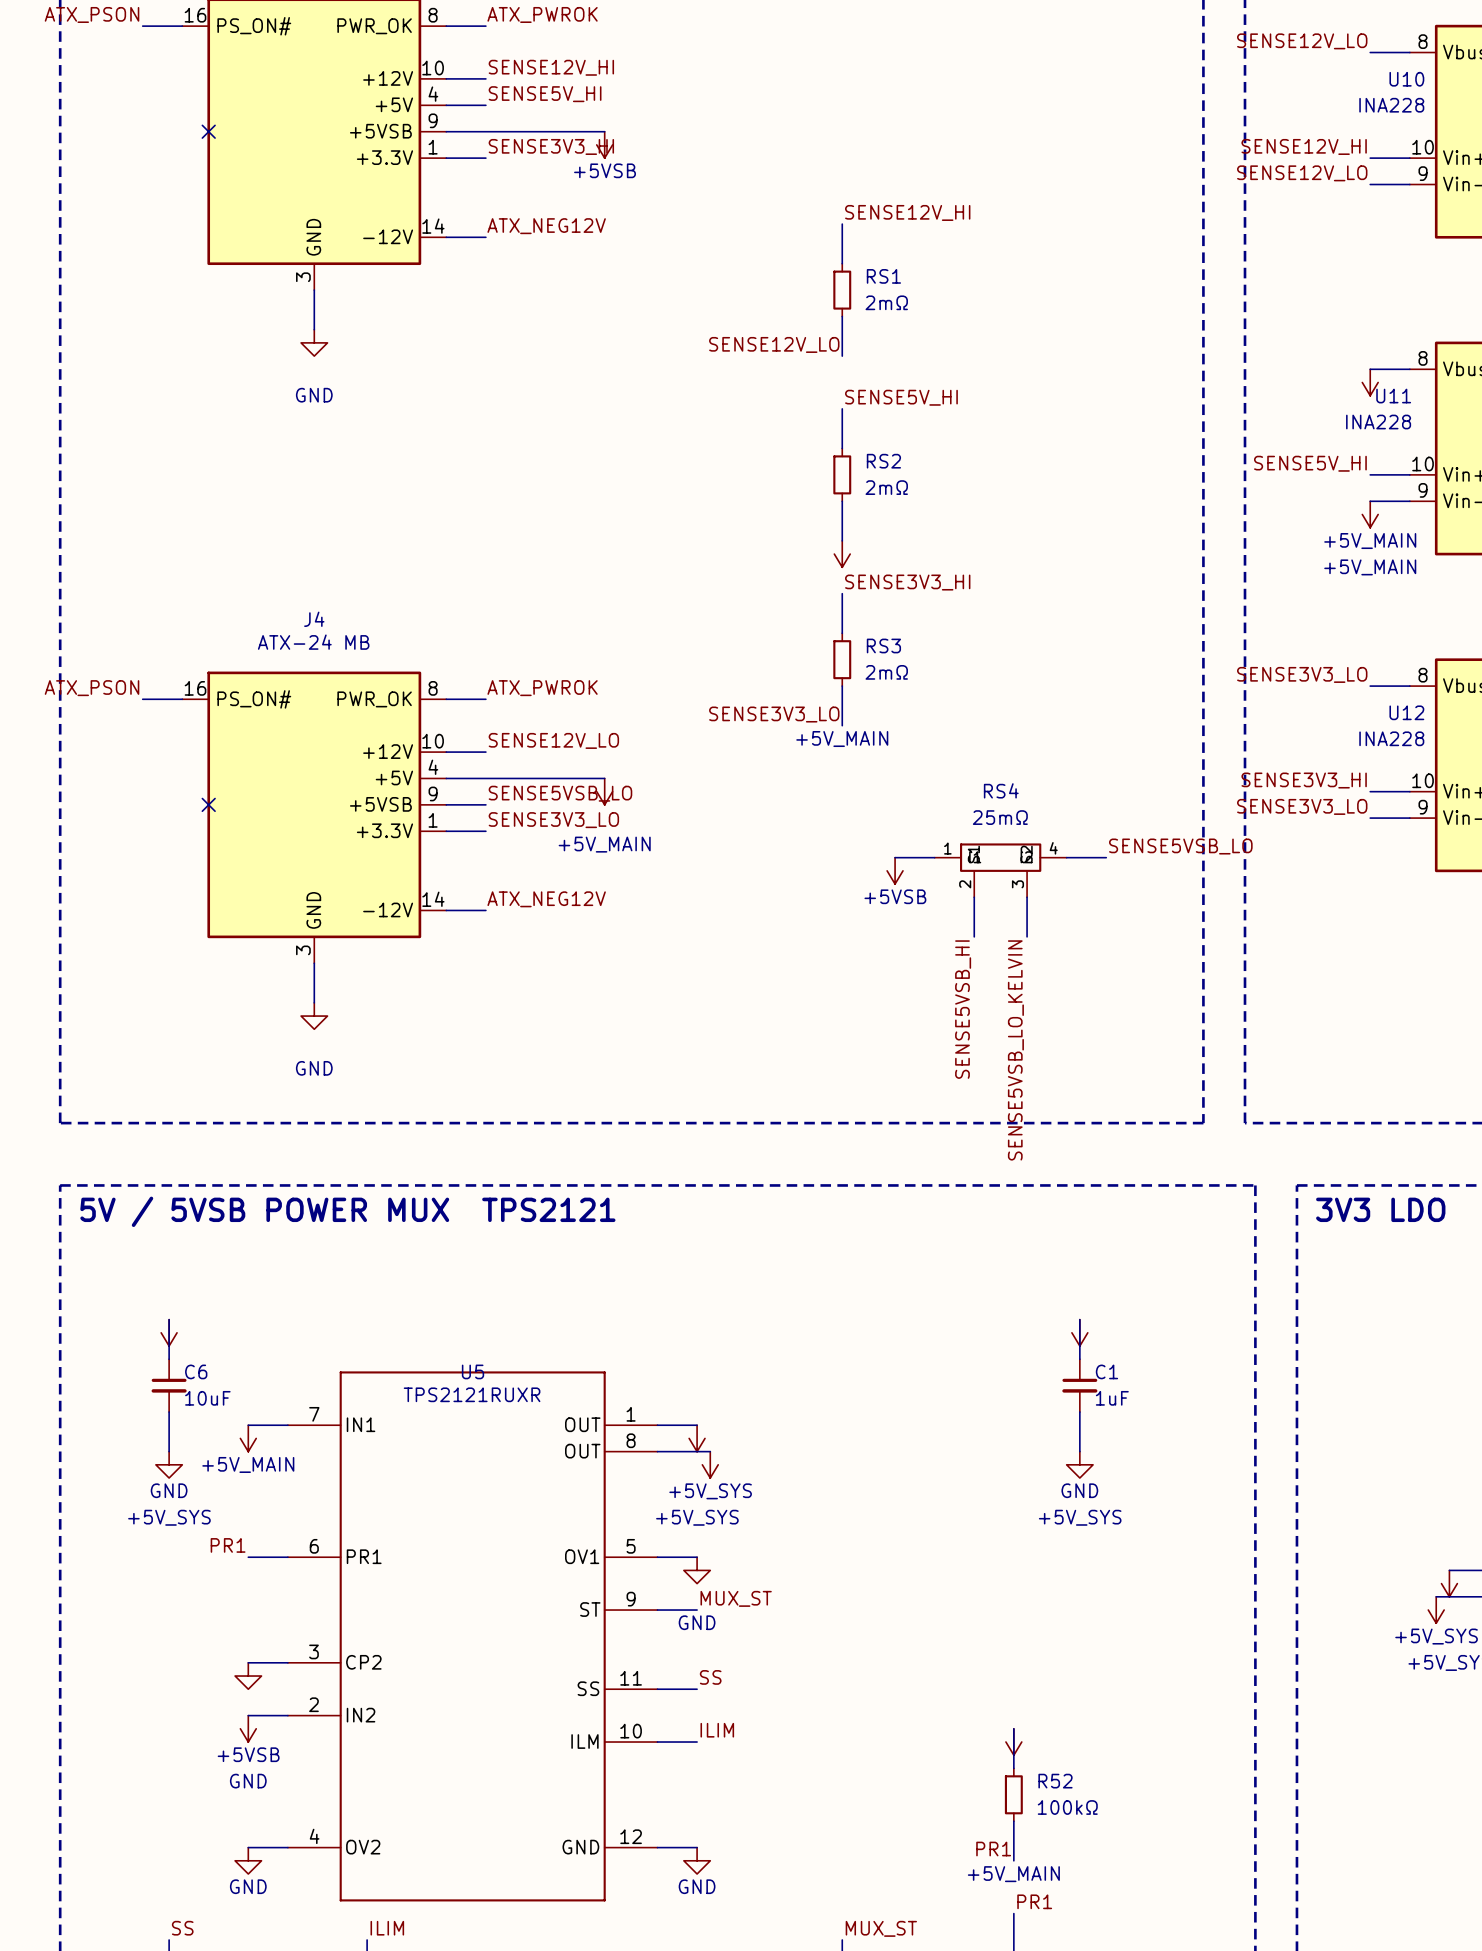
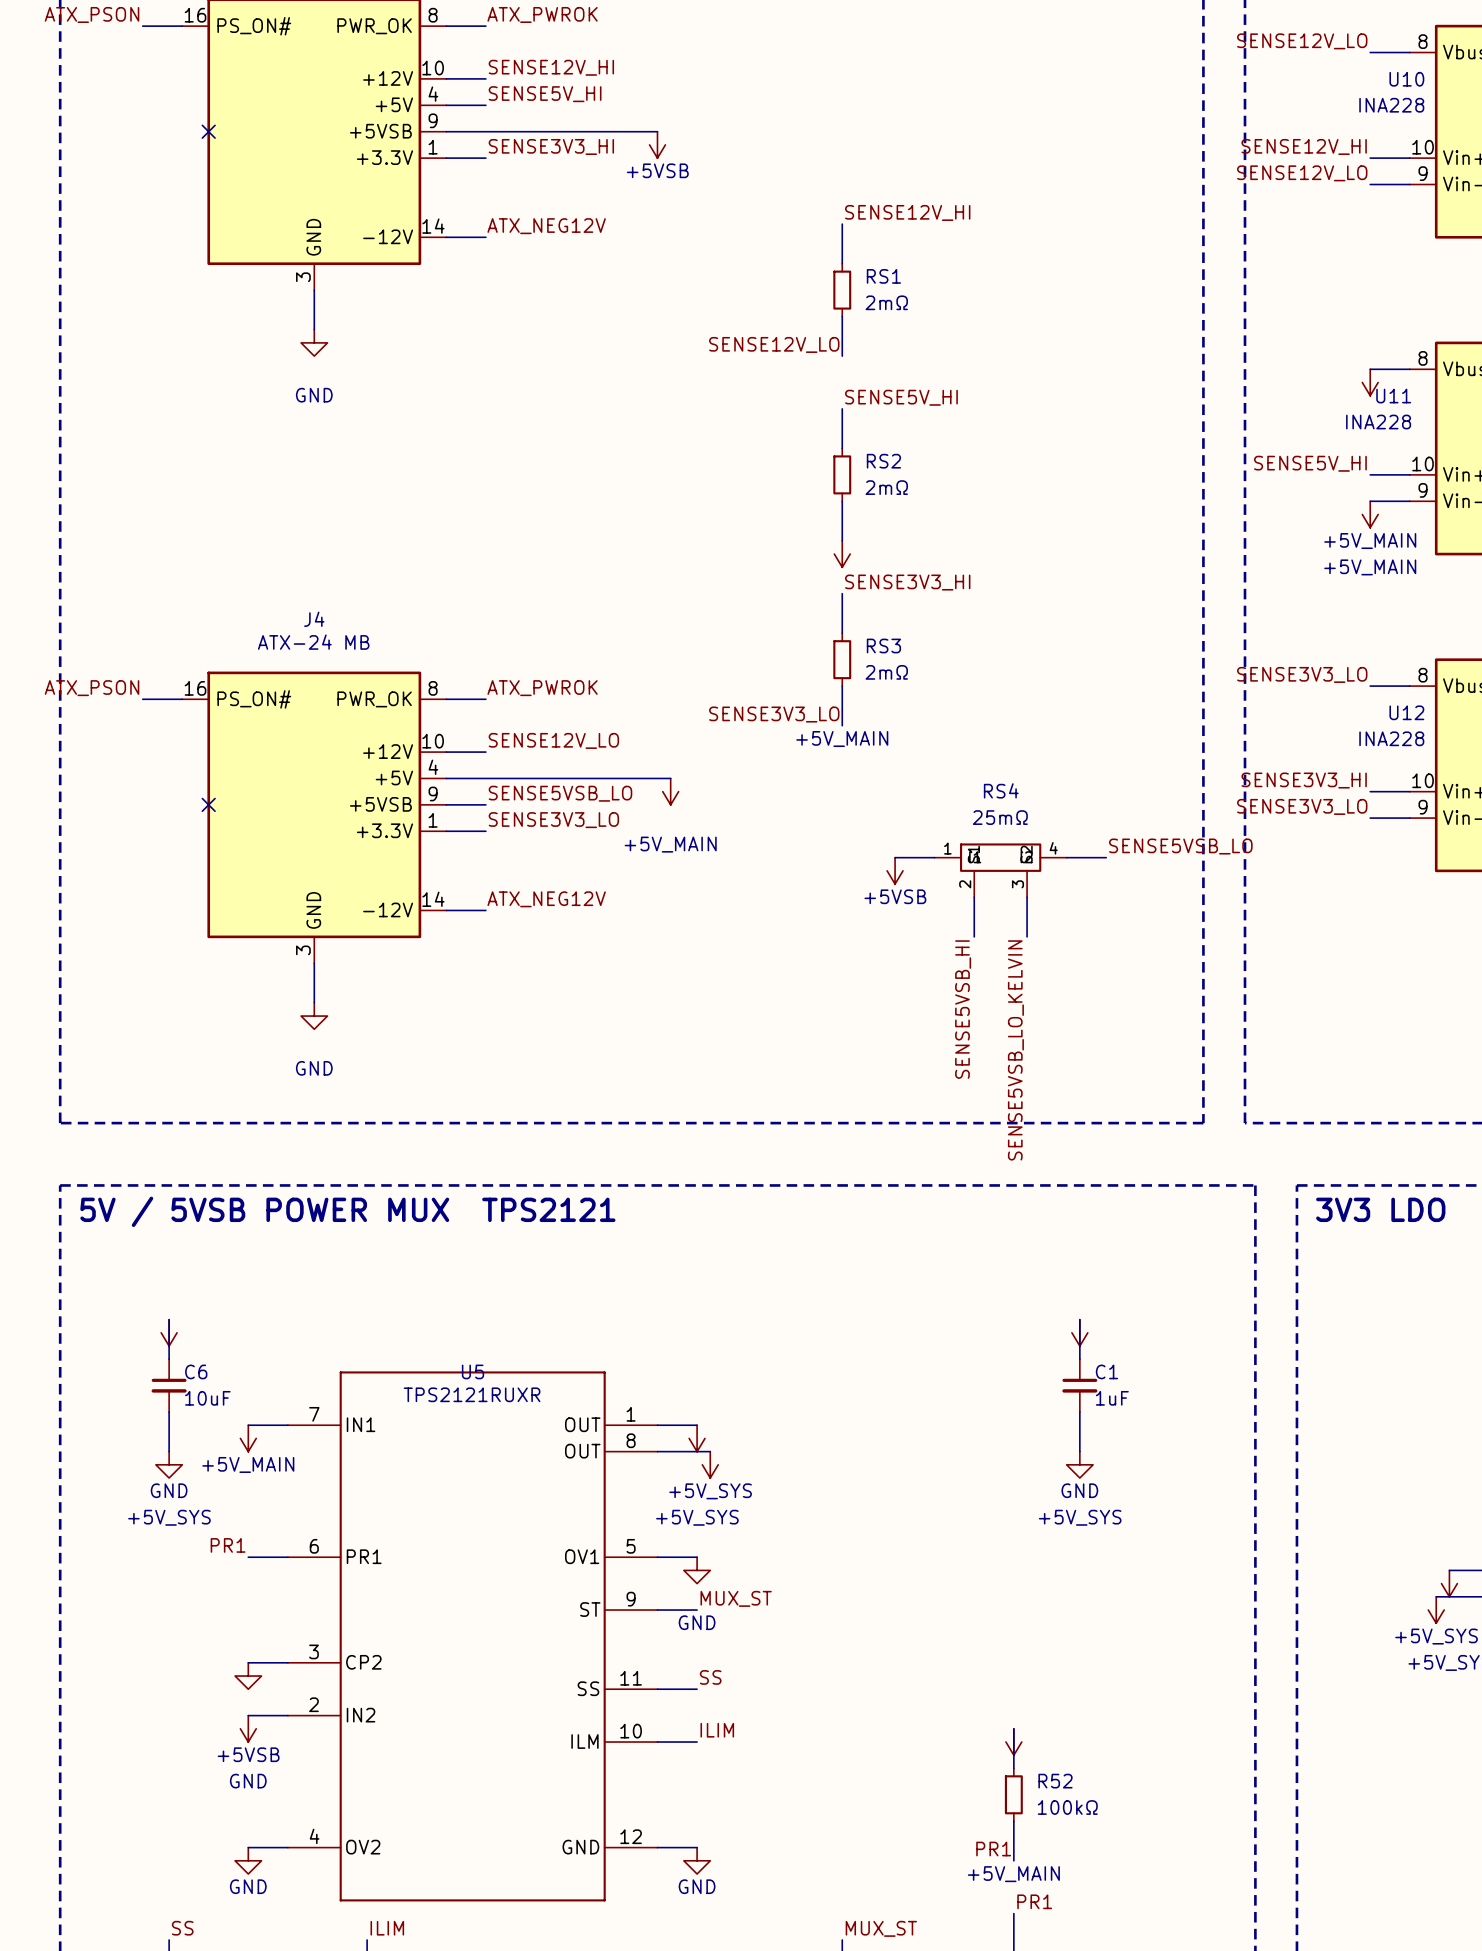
wire: none -> (604, 131) (657, 131)
power symbol position: +5VSB (604, 144) -> +5VSB (657, 144)
wire: none -> (604, 778) (670, 778)
power symbol position: +5V_MAIN (604, 791) -> +5V_MAIN (670, 791)

